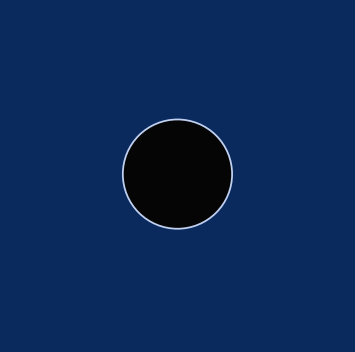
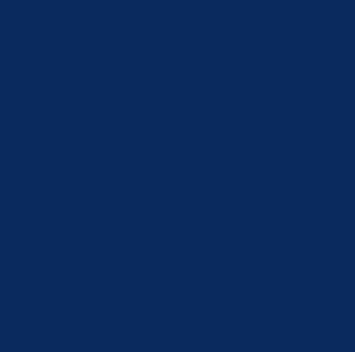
part: (177, 174) -> none

